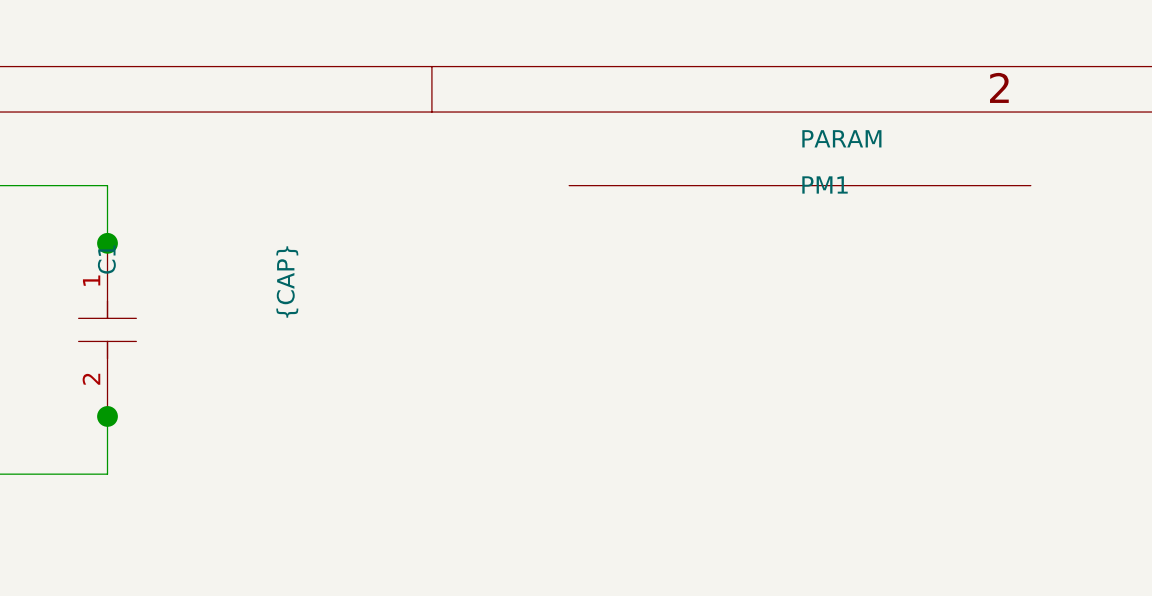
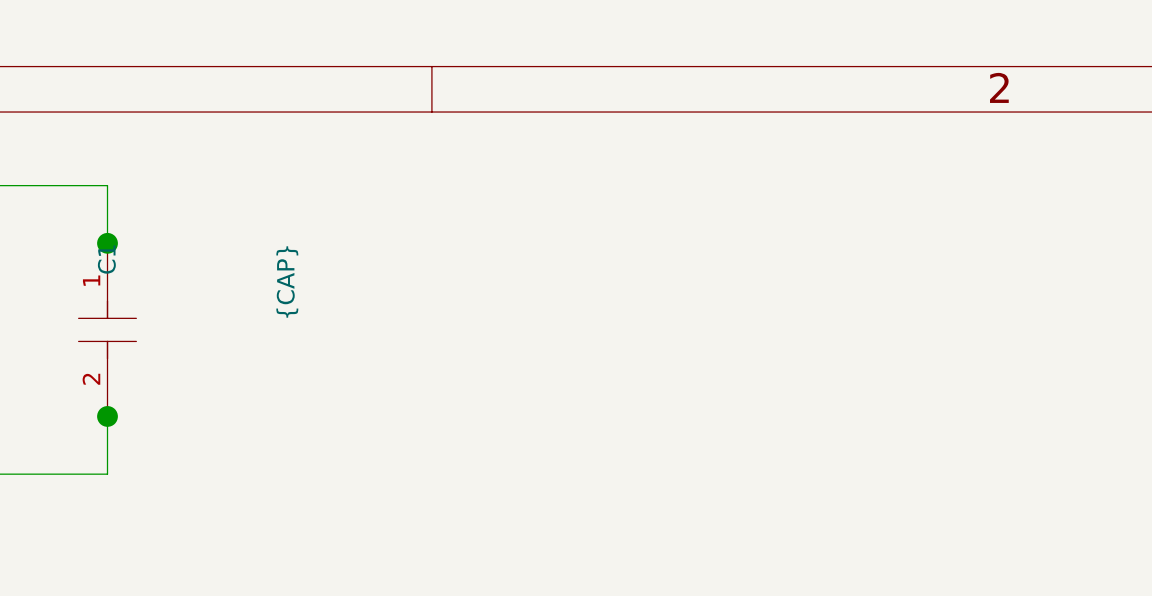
PM1: PARAM (799, 185) -> none

